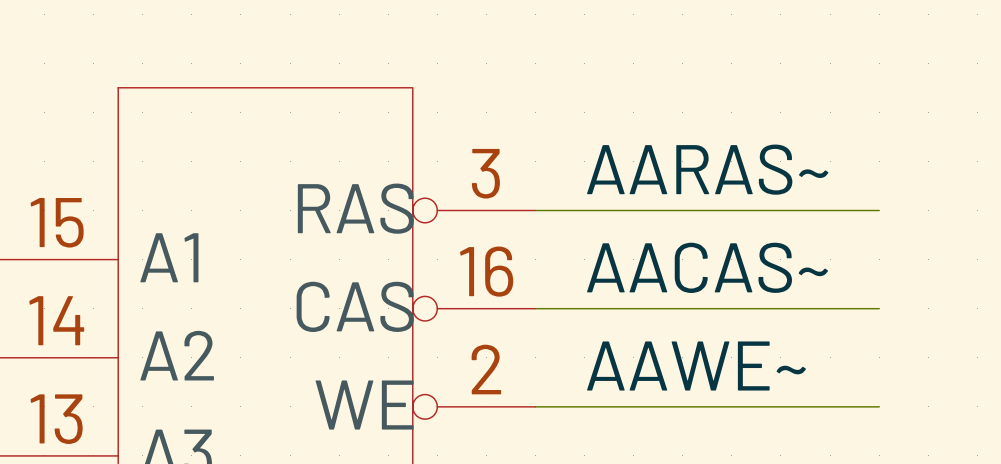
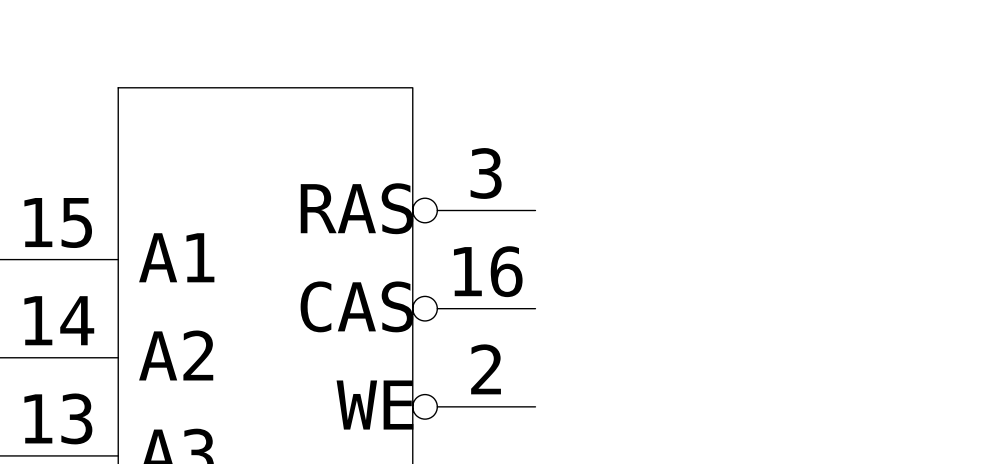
label: AARAS~ (707, 169) -> none
wire: (535, 210) (879, 210) -> none
label: AACAS~ (707, 267) -> none
wire: (535, 308) (879, 308) -> none
label: AAWE~ (696, 366) -> none
wire: (535, 406) (879, 406) -> none

